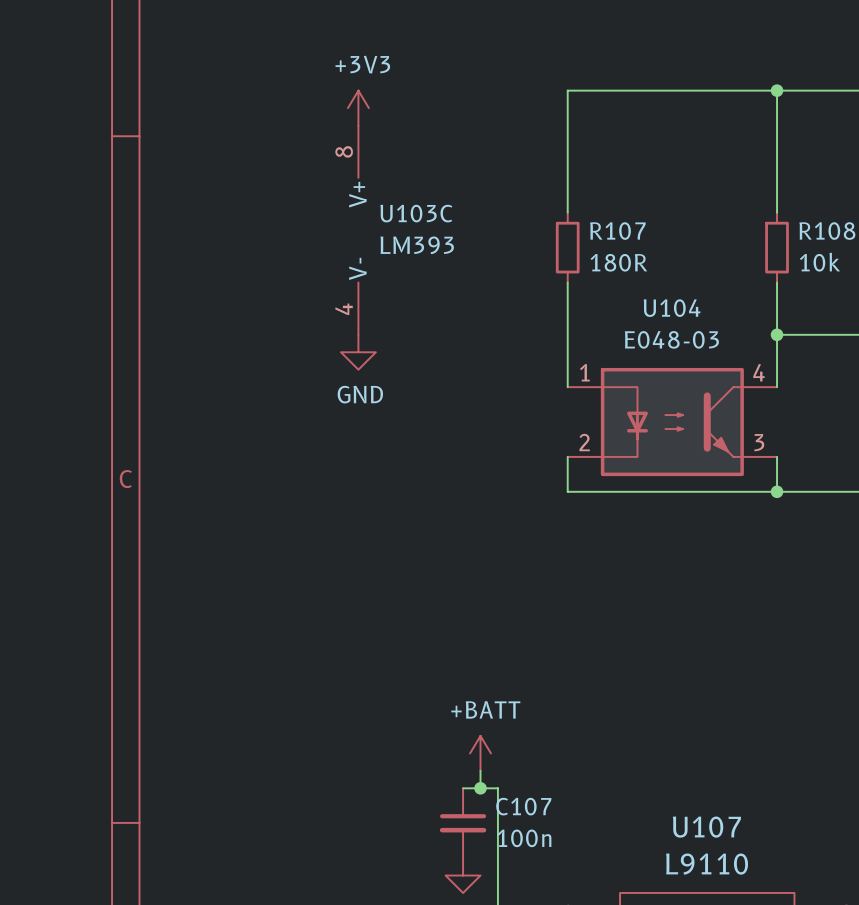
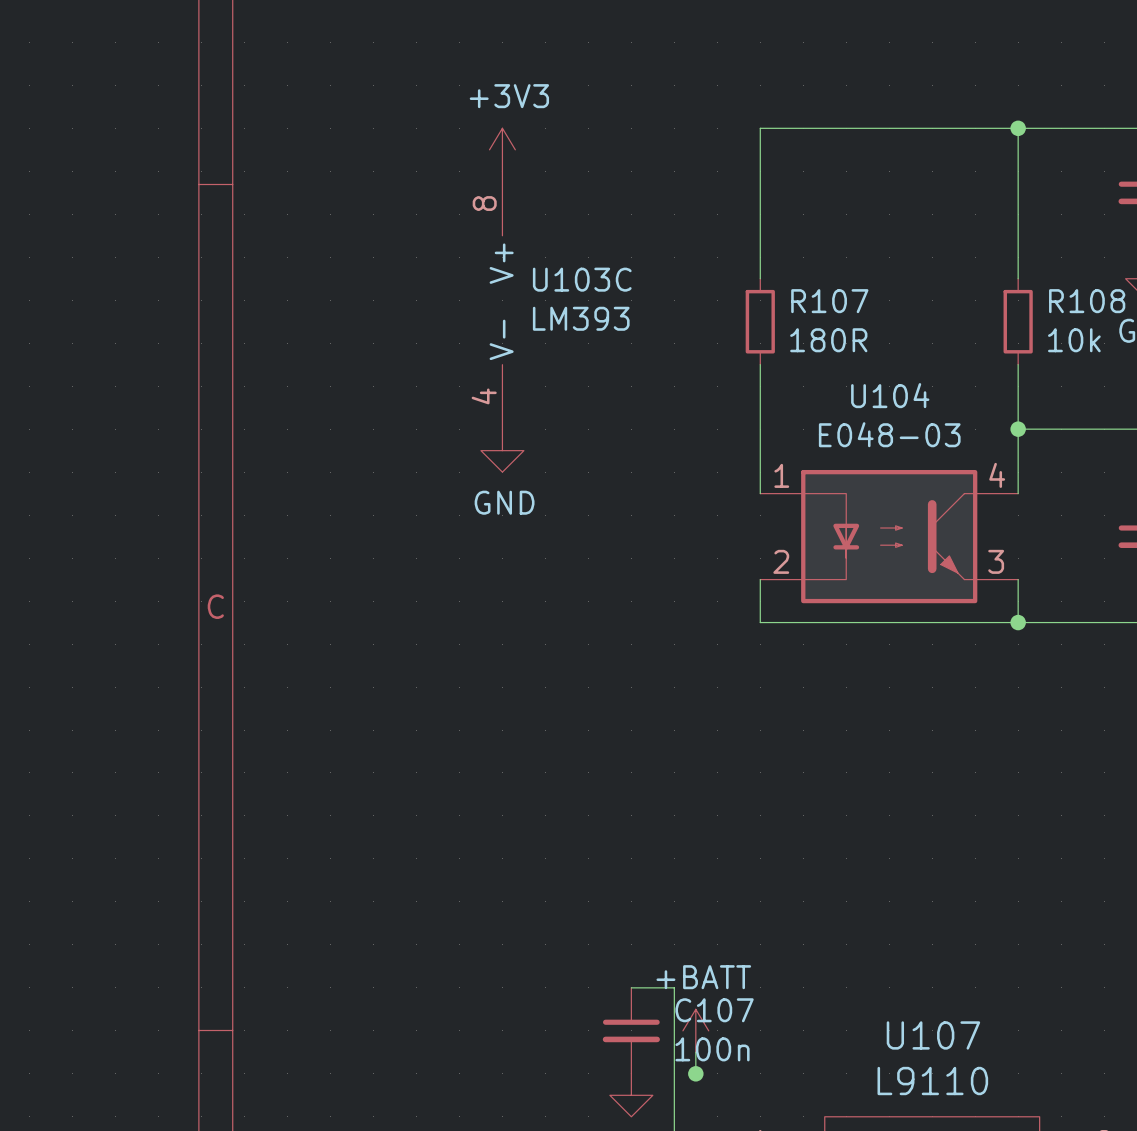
power symbol position: +BATT (480, 753) -> +BATT (695, 1030)
wire: (480, 770) (480, 788) -> (695, 1052) (695, 1073)
junction: (480, 788) -> none
junction: none -> (695, 1073)

